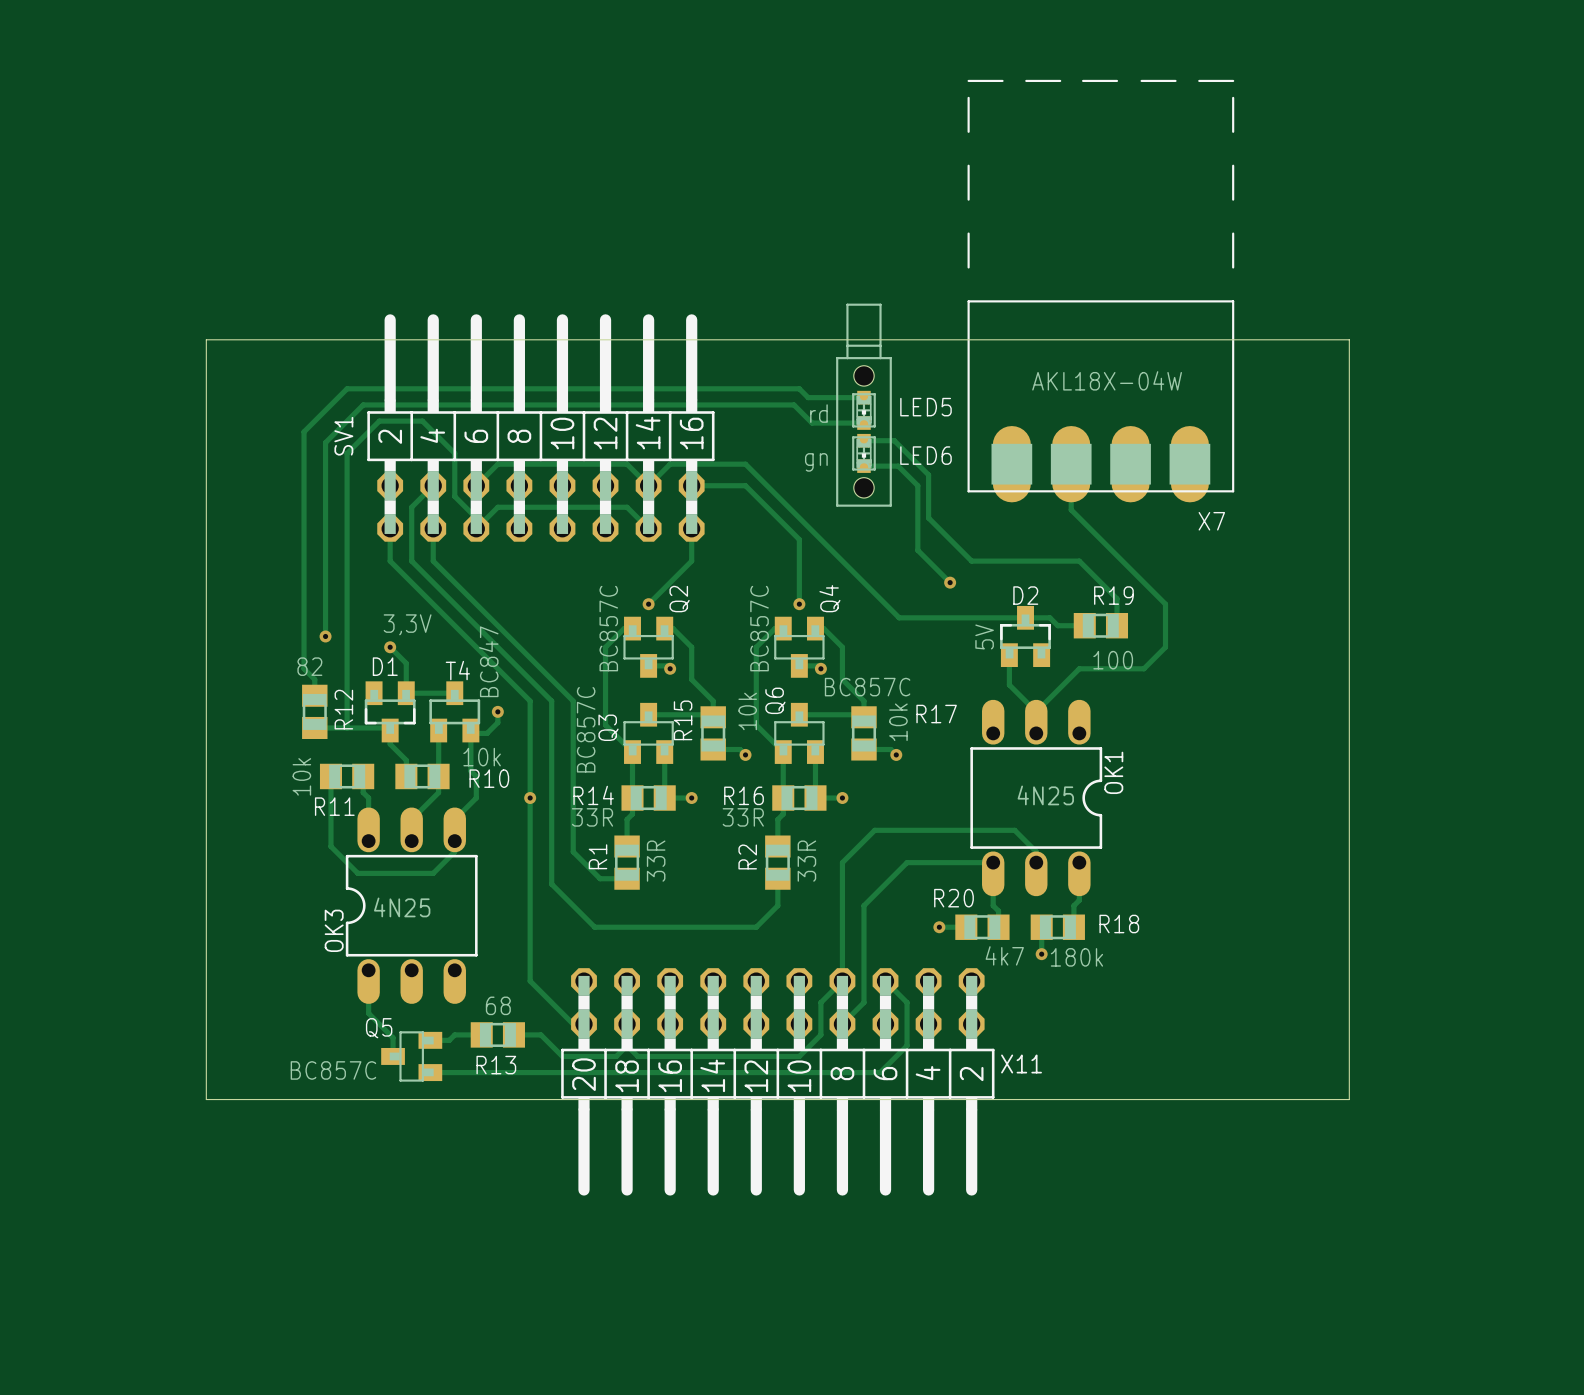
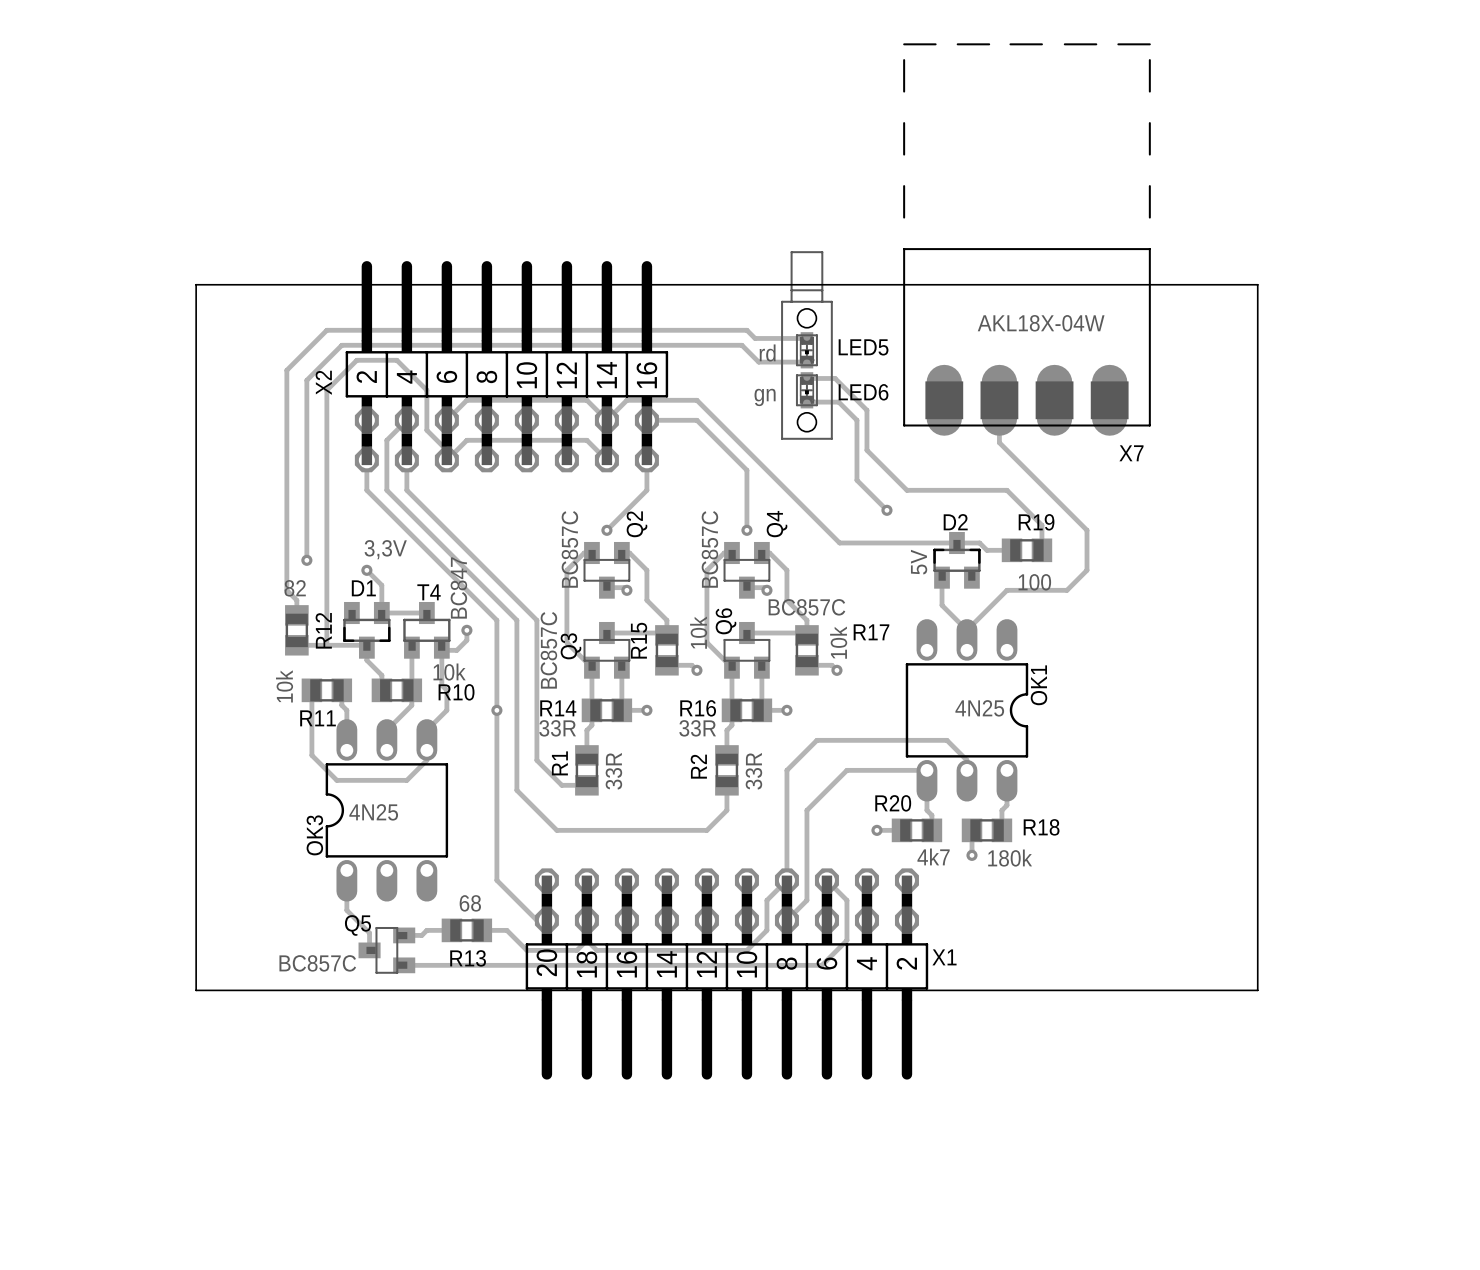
SV1 name: SV1 (343, 436) -> X2 (323, 382)
X11 name: X11 (1021, 1063) -> X1 (944, 957)

